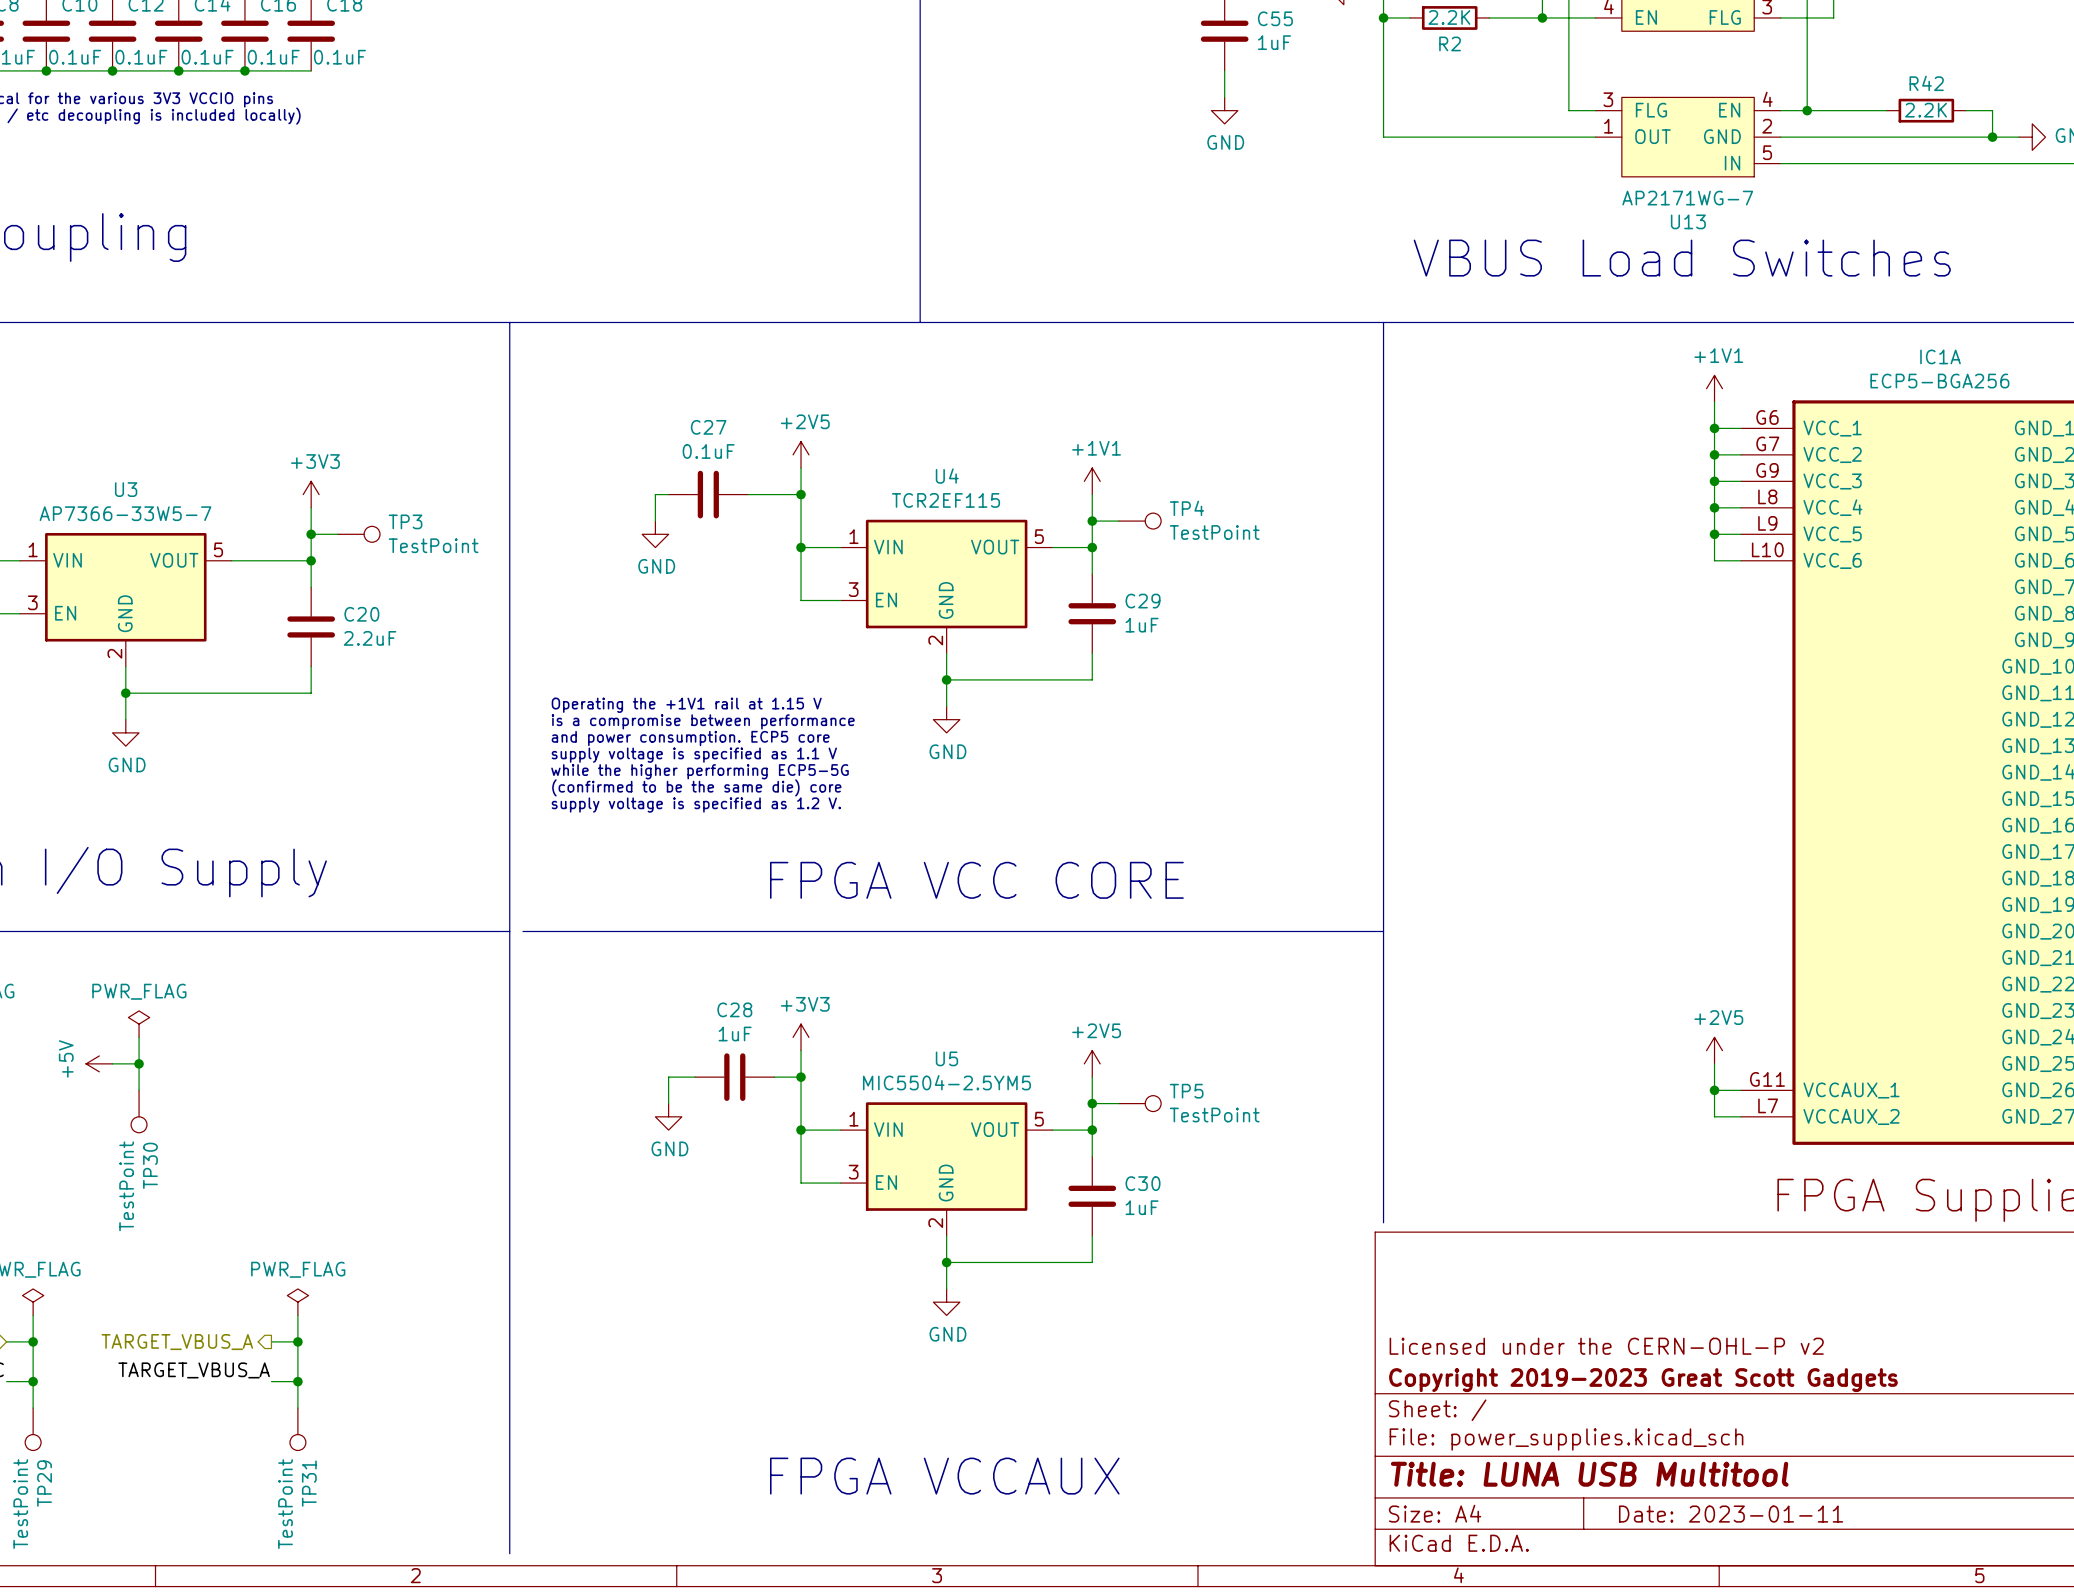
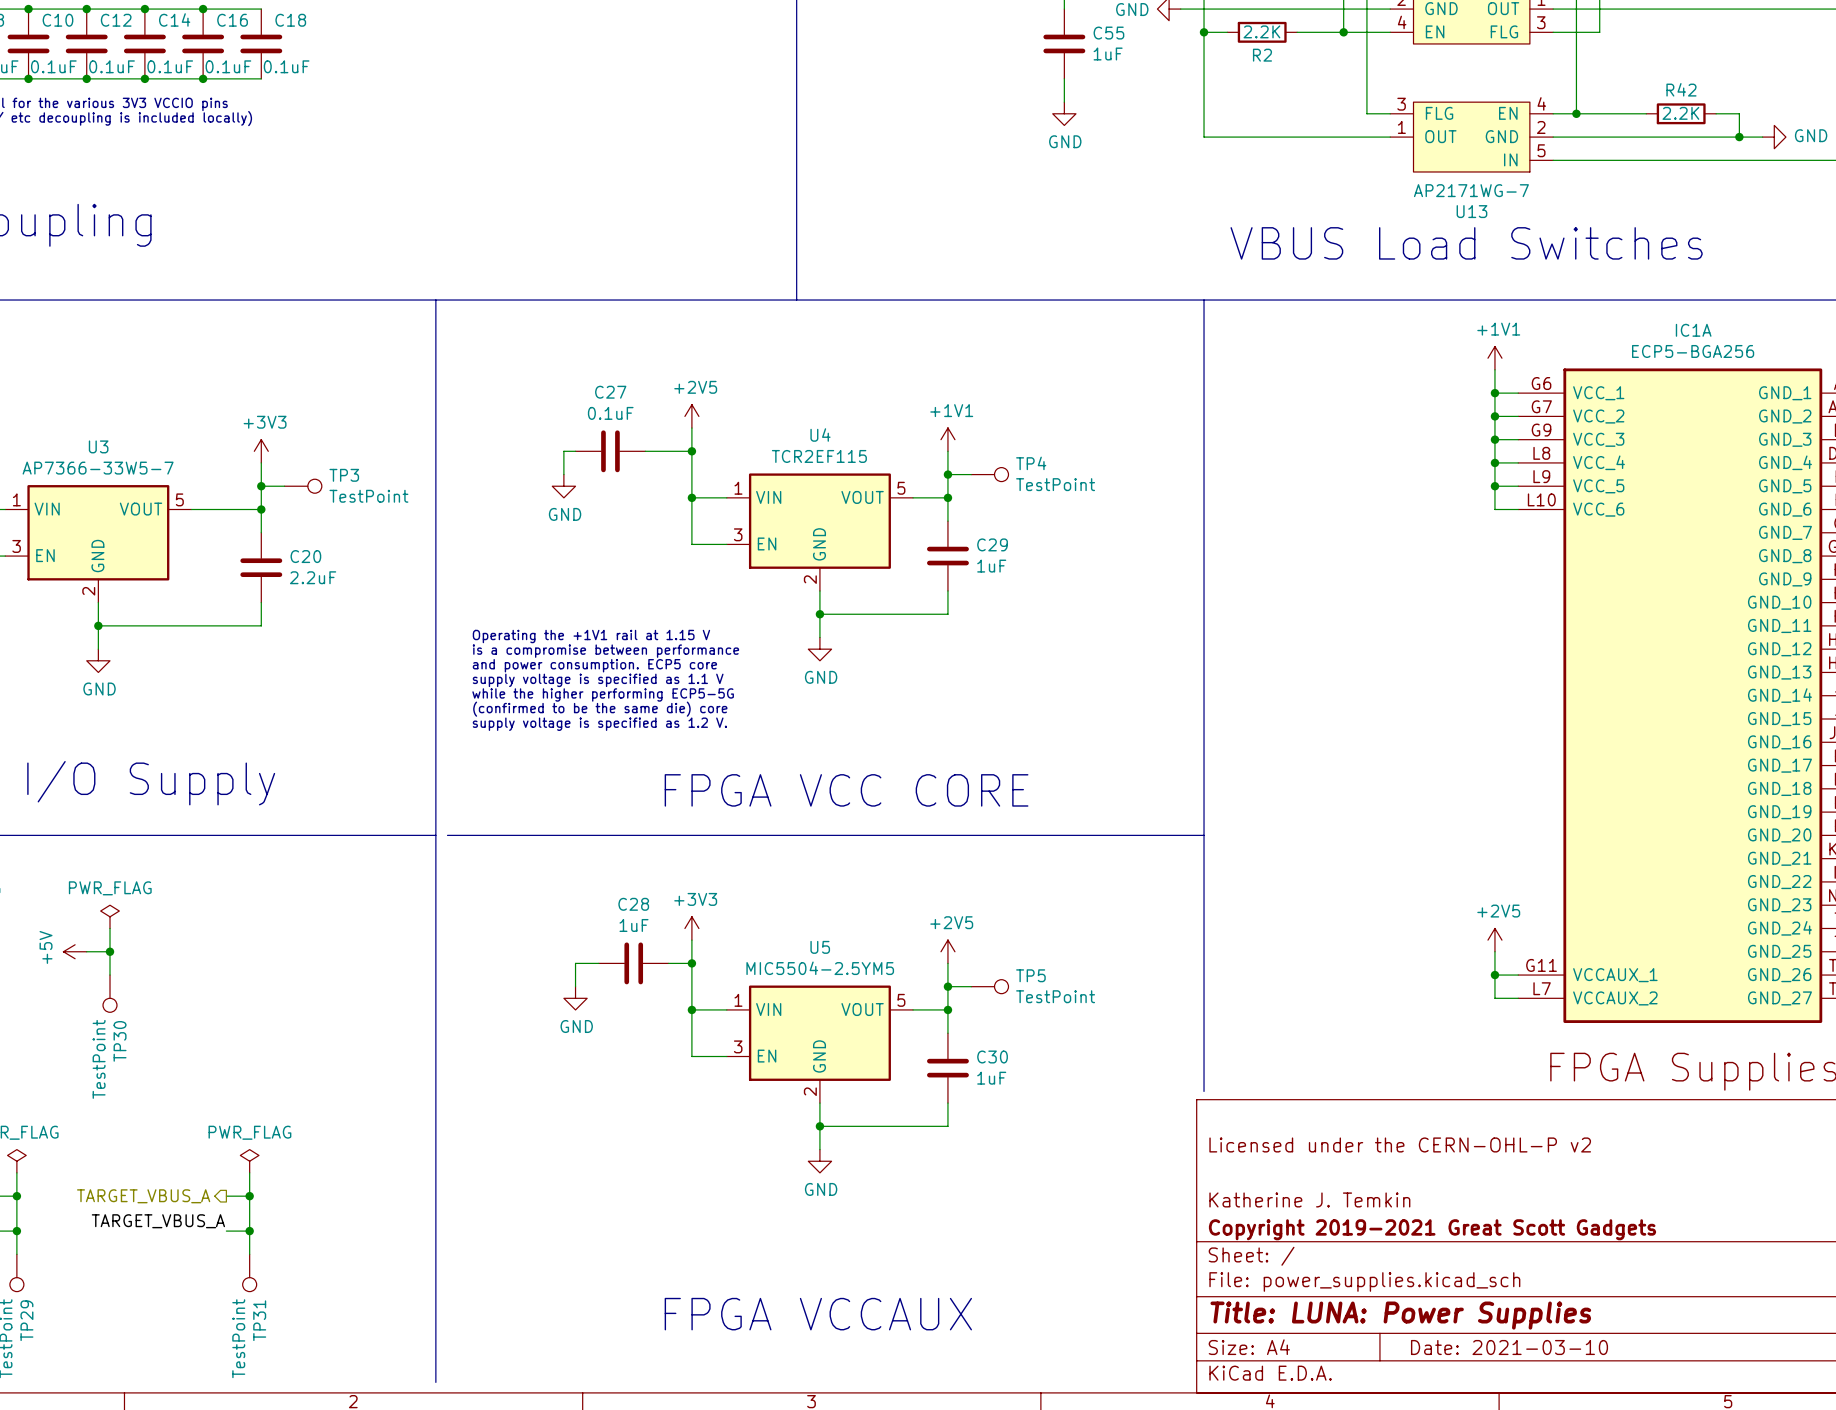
title block: none -> Licensed under the CERN-OHL-P v2 (1400, 1144)
title block: Licensed under the CERN-OHL-P v2 (1606, 1346) -> Katherine J. Temkin (1309, 1199)
title block: Copyright 2019-2023 Great Scott Gadgets (1643, 1380) -> Copyright 2019-2021 Great Scott Gadgets (1432, 1229)
title block: Title: LUNA USB Multitool (1589, 1474) -> Title: LUNA: Power Supplies (1400, 1315)
title block: Date: 2023-01-11 (1731, 1514) -> Date: 2021-03-10 (1509, 1347)

